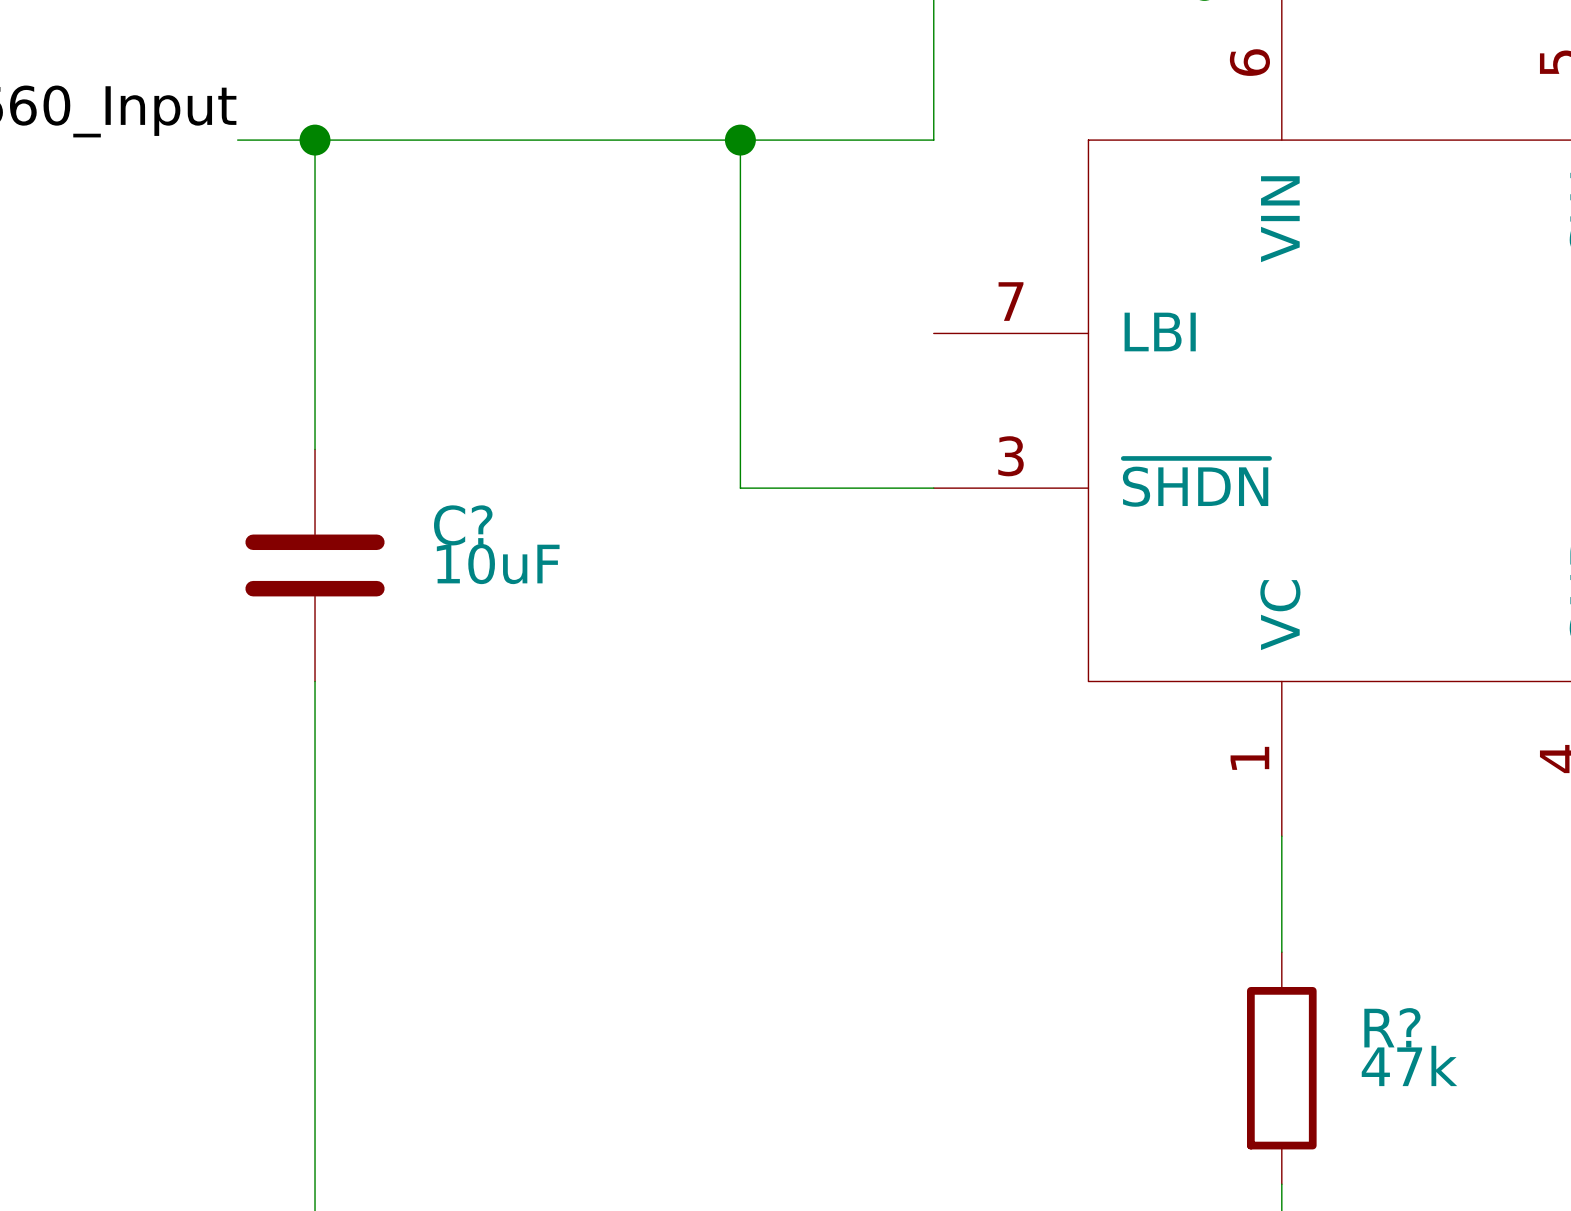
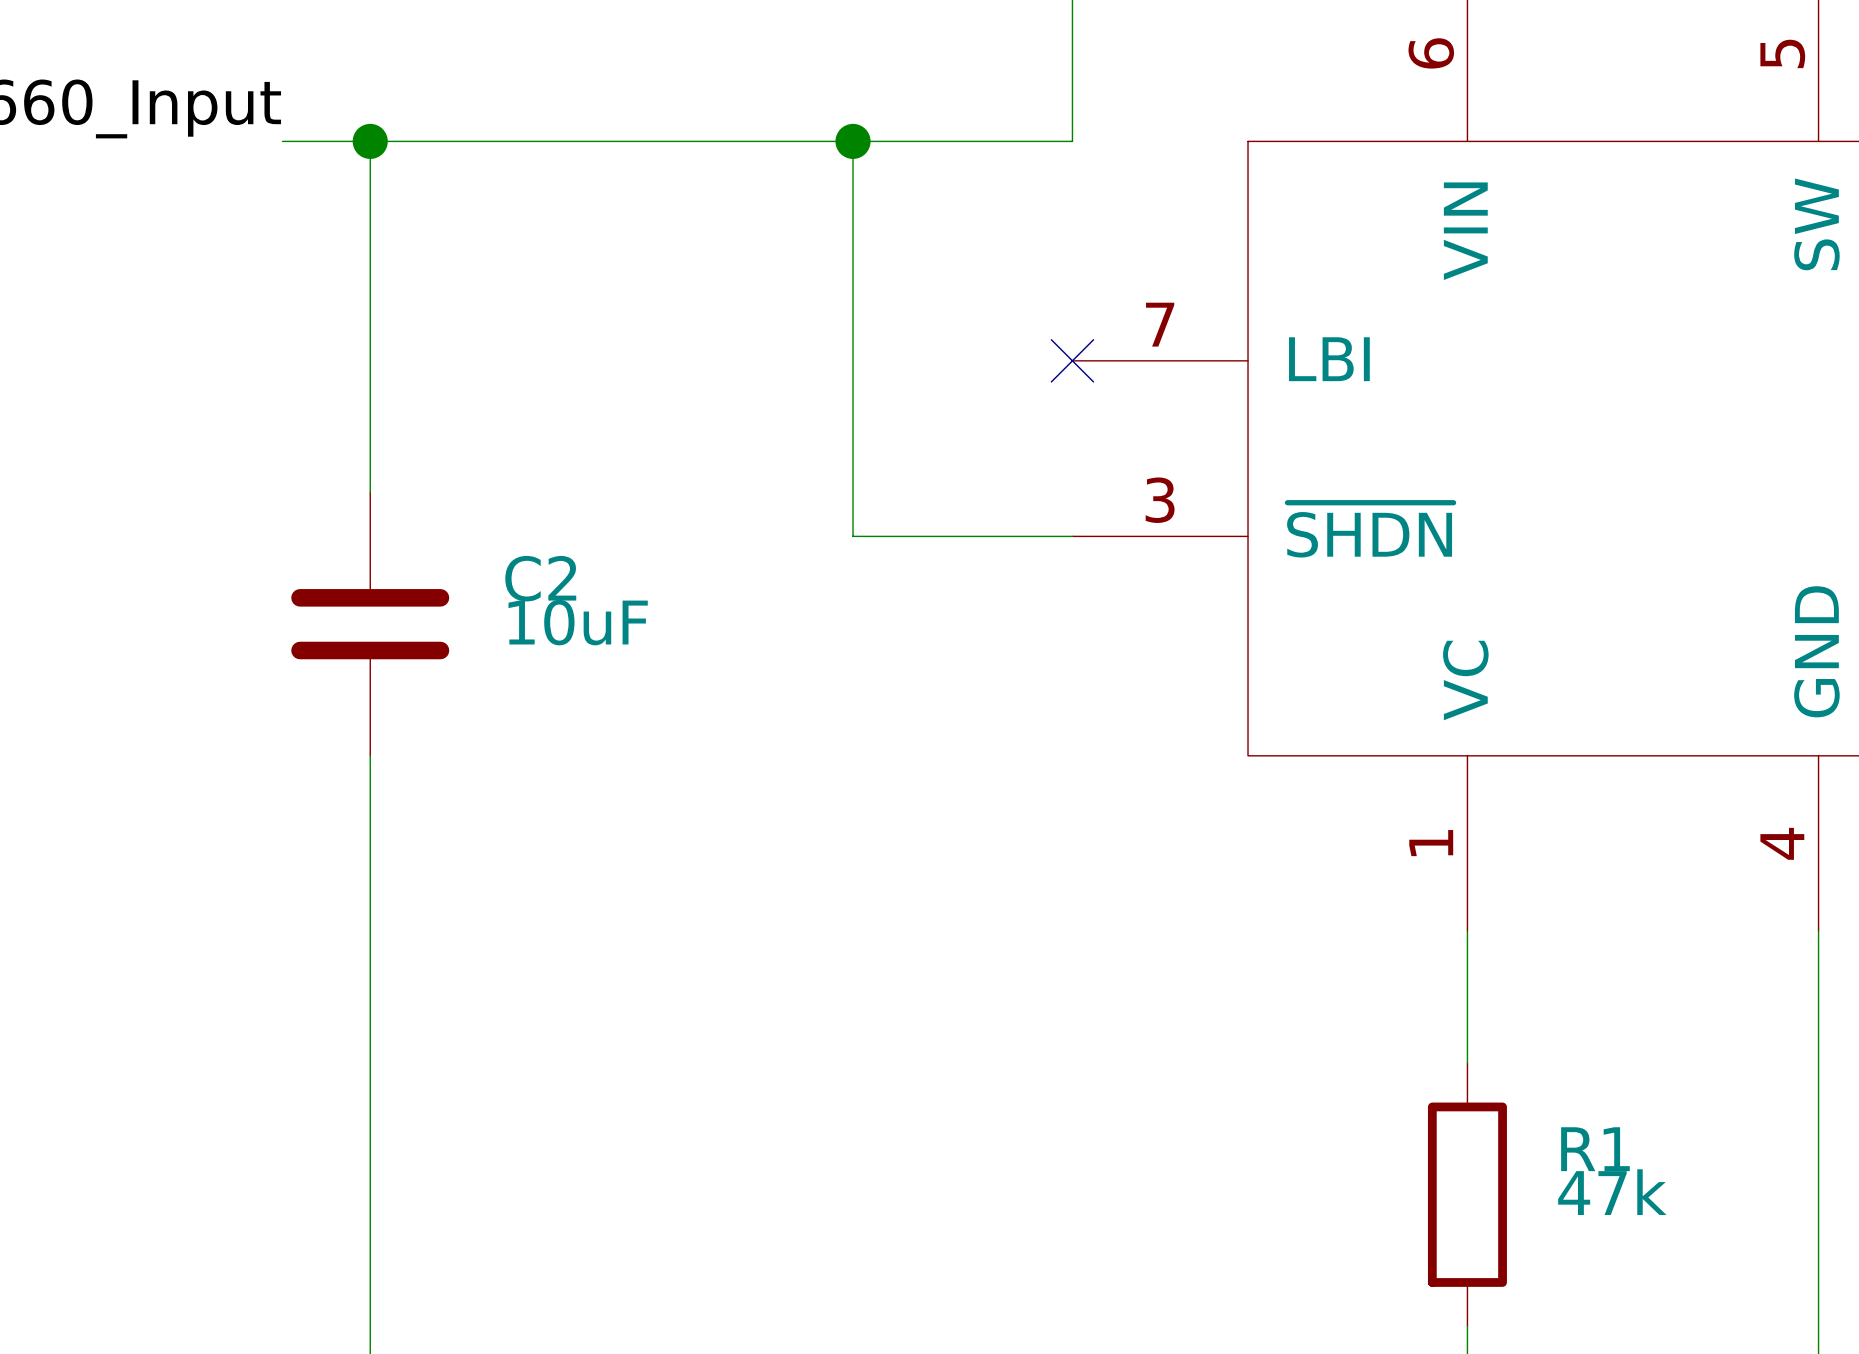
no-connect mark: none -> (1072, 360)
C? name: C? (463, 525) -> C2 (540, 578)
R? name: R? (1392, 1027) -> R1 (1595, 1149)

